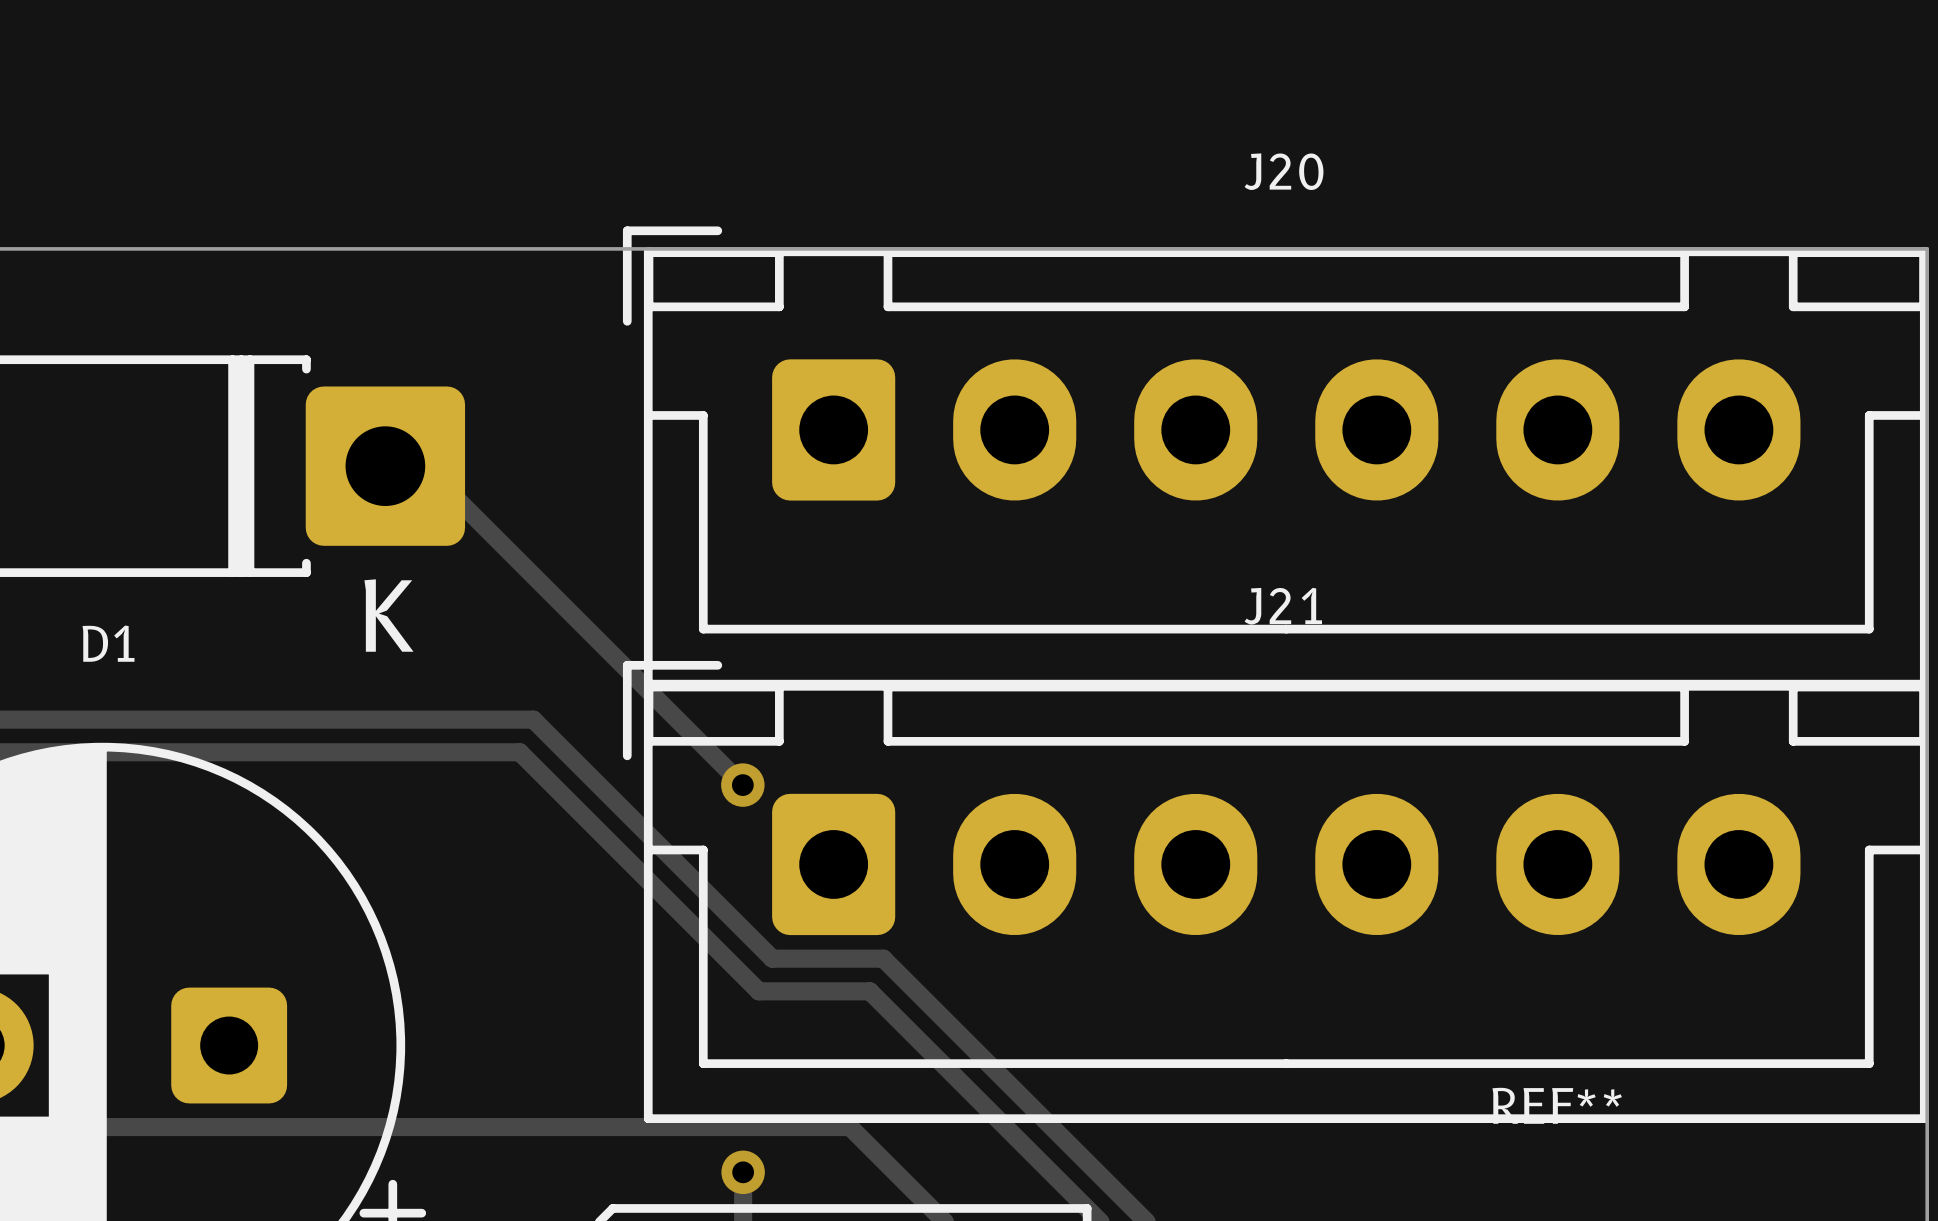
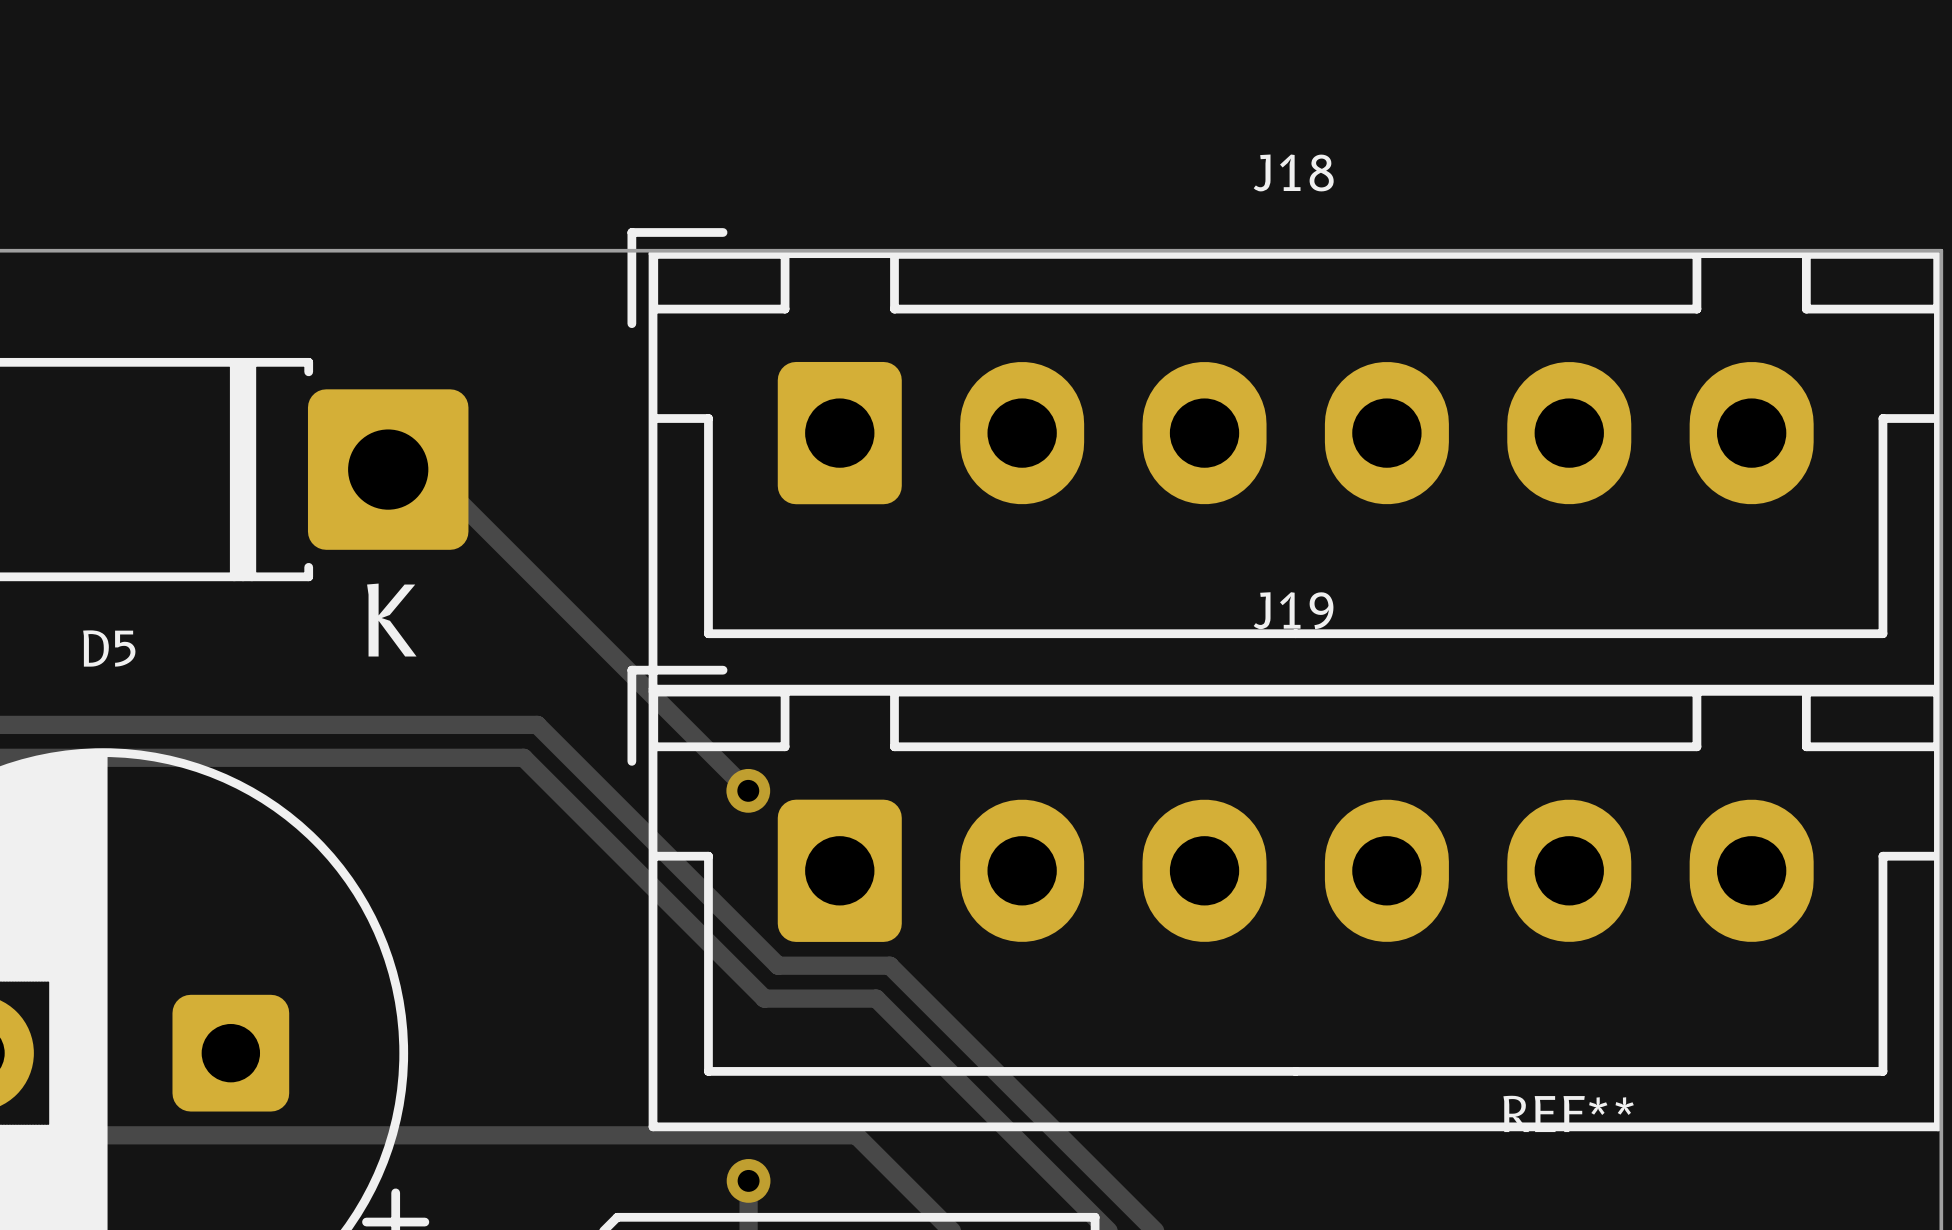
J20 name: J20 (1284, 171) -> J18 (1293, 172)
J21 name: J21 (1283, 606) -> J19 (1293, 610)
D1 name: D1 (108, 643) -> D5 (109, 648)

